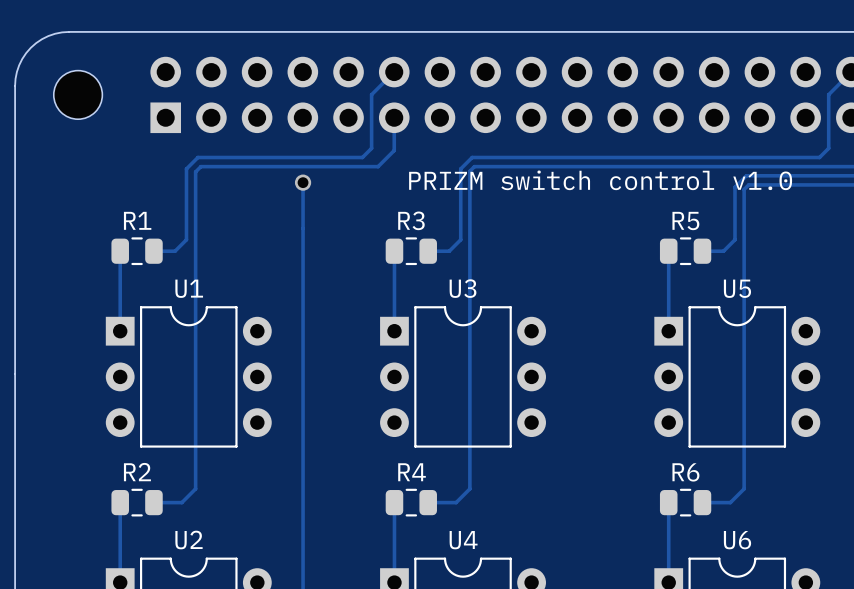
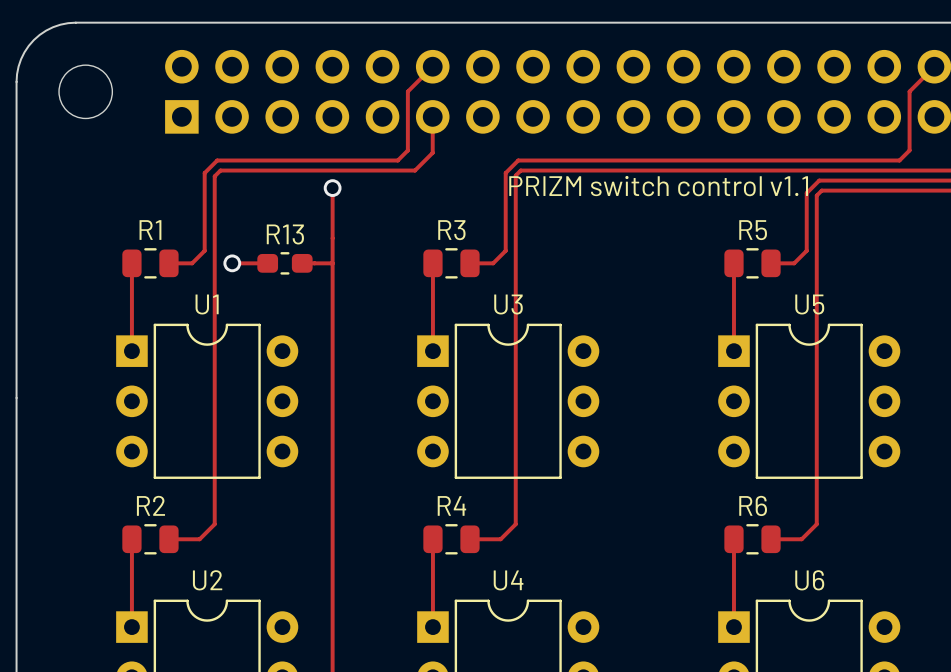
text: PRIZM switch control v1.0 (600, 180) -> PRIZM switch control v1.1 (658, 186)
track: none -> (232, 263) (267, 263)
via: none -> (232, 263)
R13: none -> (284, 263)
track: none -> (302, 263) (332, 263)

